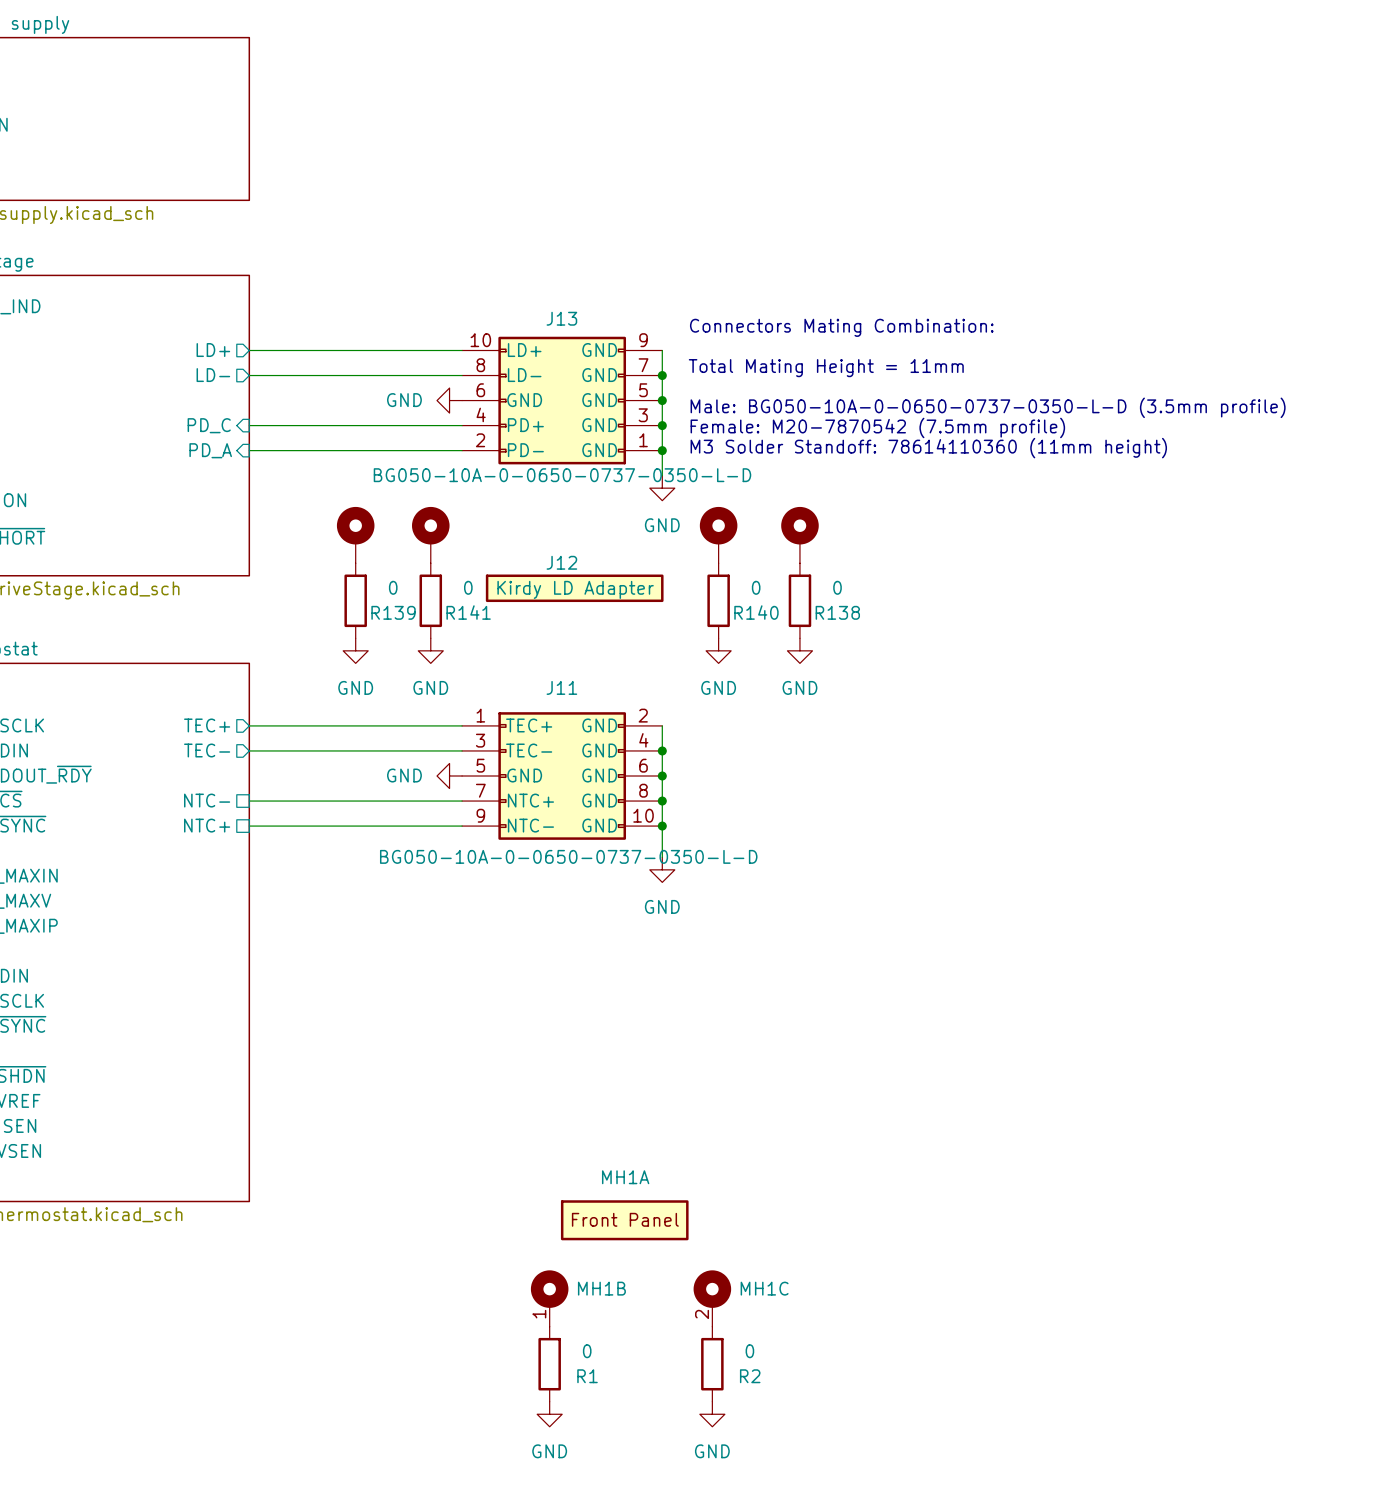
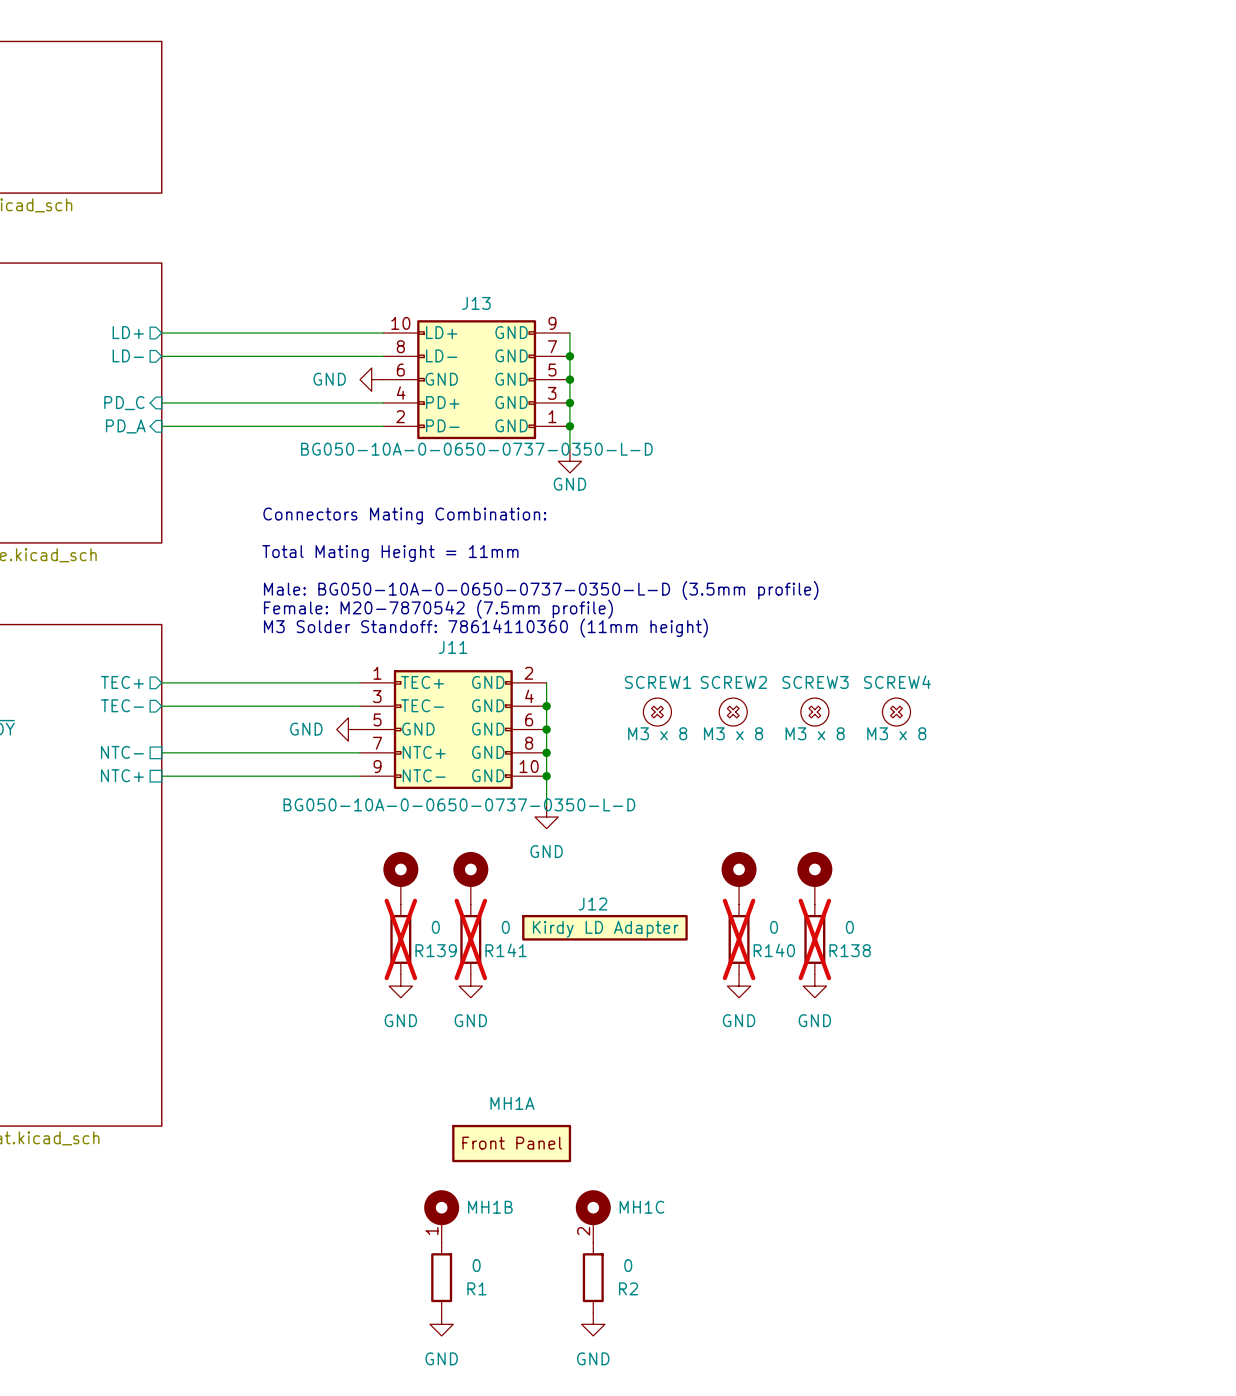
text: Connectors Mating Combination: (841, 327) -> none
wire: (662, 350) (662, 475) -> (569, 333) (569, 449)
text: Total Mating Height = 11mm (826, 368) -> none
junction: (662, 375) -> none
junction: none -> (569, 356)
power symbol position: GND (449, 400) -> GND (371, 379)
J13 position: (562, 400) -> (476, 379)
junction: (662, 400) -> none
junction: none -> (569, 379)
text: Male: BG050-10A-0-0650-0737-0350-L-D (3.5mm profile) (988, 407) -> none
junction: (662, 425) -> none
junction: none -> (569, 402)
text: Female: M20-7870542 (7.5mm profile) (877, 427) -> none
text: M3 Solder Standoff: 78614110360 (11mm height) (928, 448) -> none
junction: (662, 450) -> none
junction: none -> (569, 426)
power symbol position: GND (662, 488) -> GND (569, 461)
power symbol text position: GND (662, 525) -> GND (569, 484)
part: (355, 535) -> none
part: (430, 535) -> none
part: (718, 535) -> none
part: (799, 535) -> none
text: none -> Connectors Mating Combination: (404, 515)
text: none -> Total Mating Height = 11mm (390, 553)
J12 position: (574, 588) -> (604, 927)
R139 position: (355, 600) -> (400, 939)
R141 position: (430, 600) -> (470, 939)
R140 position: (718, 600) -> (739, 939)
R138 position: (799, 600) -> (814, 939)
text: none -> Male: BG050-10A-0-0650-0737-0350-L-D (3.5mm profile) (541, 590)
text: none -> Female: M20-7870542 (7.5mm profile) (438, 609)
power symbol: GND (355, 650) -> none
power symbol: GND (430, 650) -> none
power symbol: GND (718, 650) -> none
power symbol: GND (799, 650) -> none
text: none -> M3 Solder Standoff: 78614110360 (11mm height) (485, 628)
SCREW1: none -> M3 x 8 (657, 712)
SCREW2: none -> M3 x 8 (733, 712)
SCREW3: none -> M3 x 8 (814, 712)
SCREW4: none -> M3 x 8 (896, 712)
part: none -> (400, 878)
part: none -> (470, 878)
part: none -> (739, 878)
part: none -> (814, 878)
R139 do-not-place cross: none -> (400, 939)
R141 do-not-place cross: none -> (470, 939)
R140 do-not-place cross: none -> (739, 939)
R138 do-not-place cross: none -> (814, 939)
power symbol: none -> GND (400, 986)
power symbol: none -> GND (470, 986)
power symbol: none -> GND (739, 986)
power symbol: none -> GND (814, 986)

